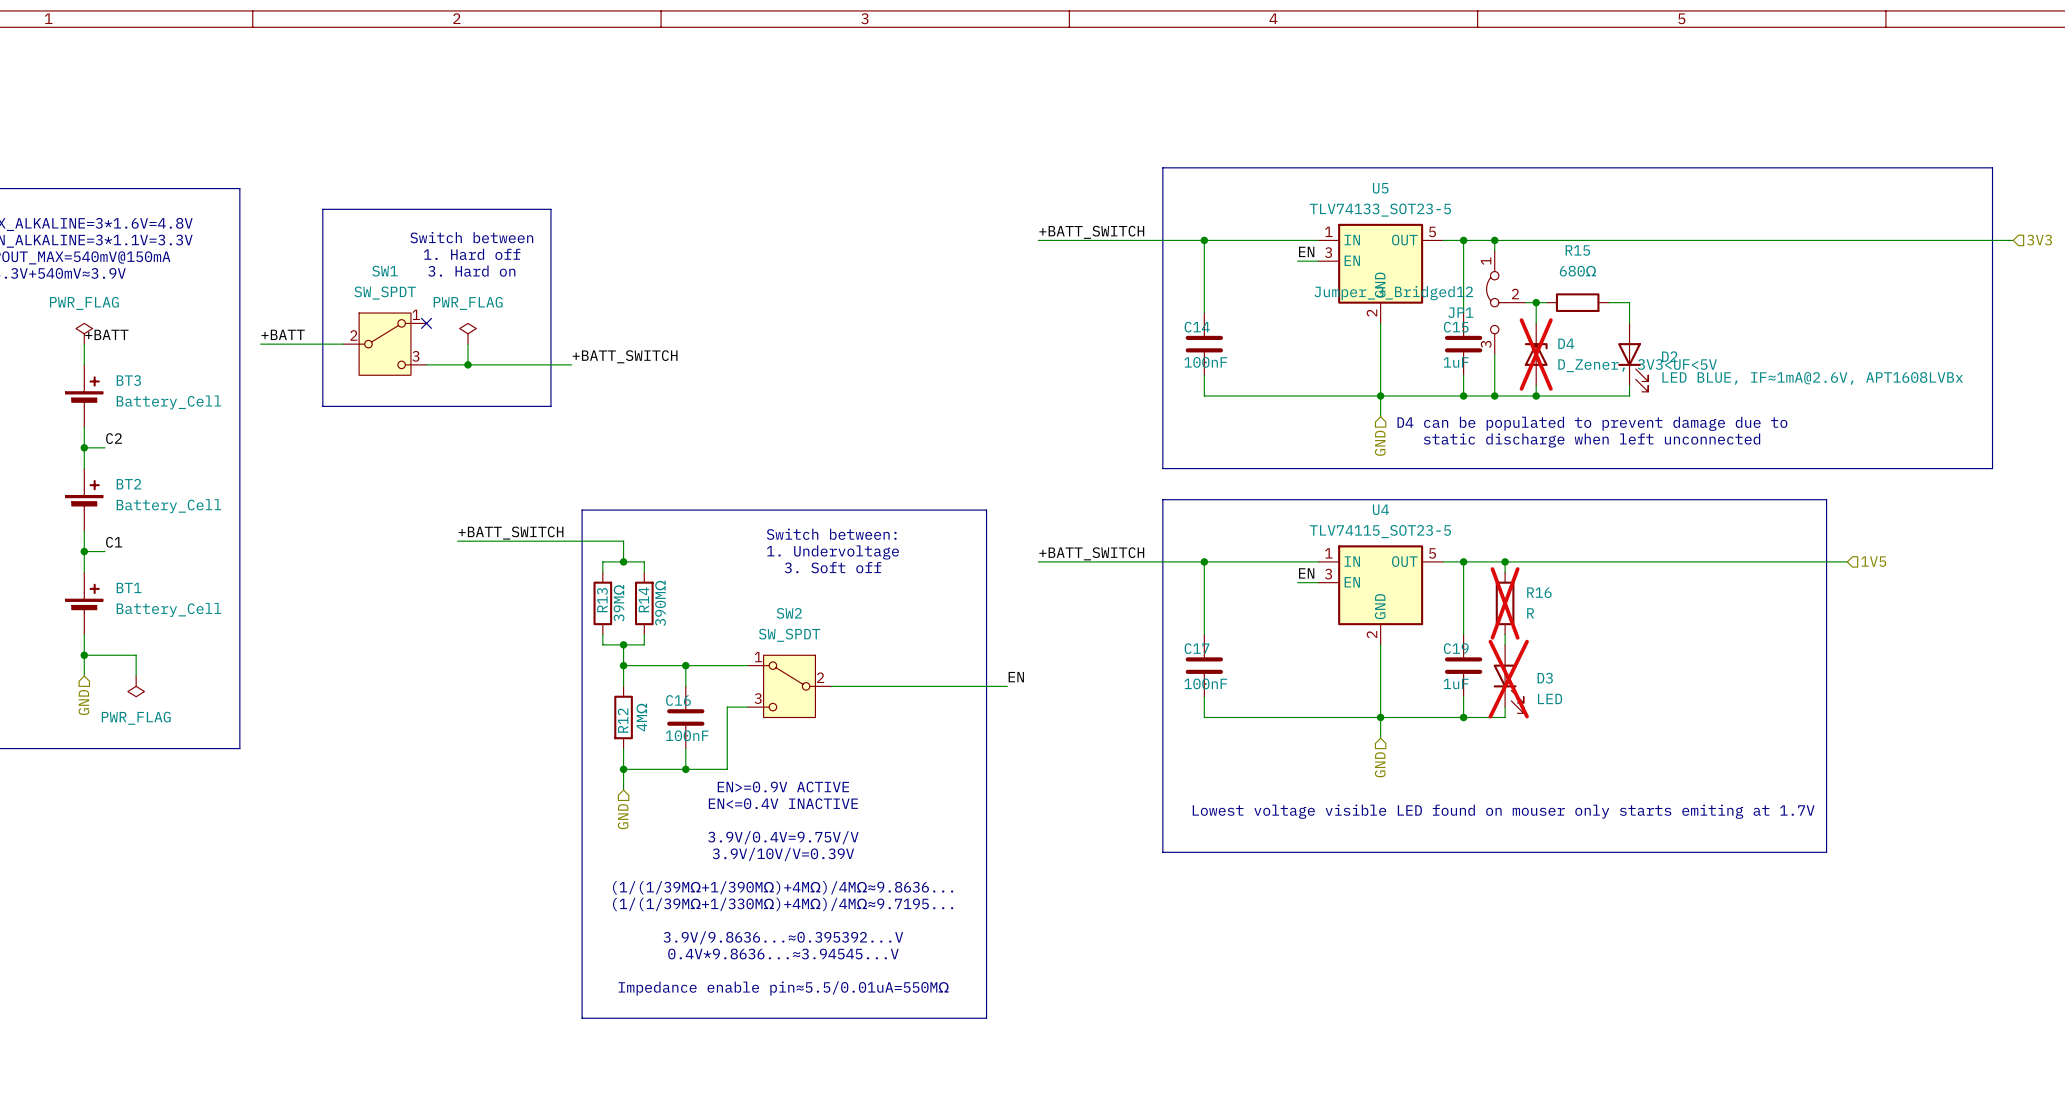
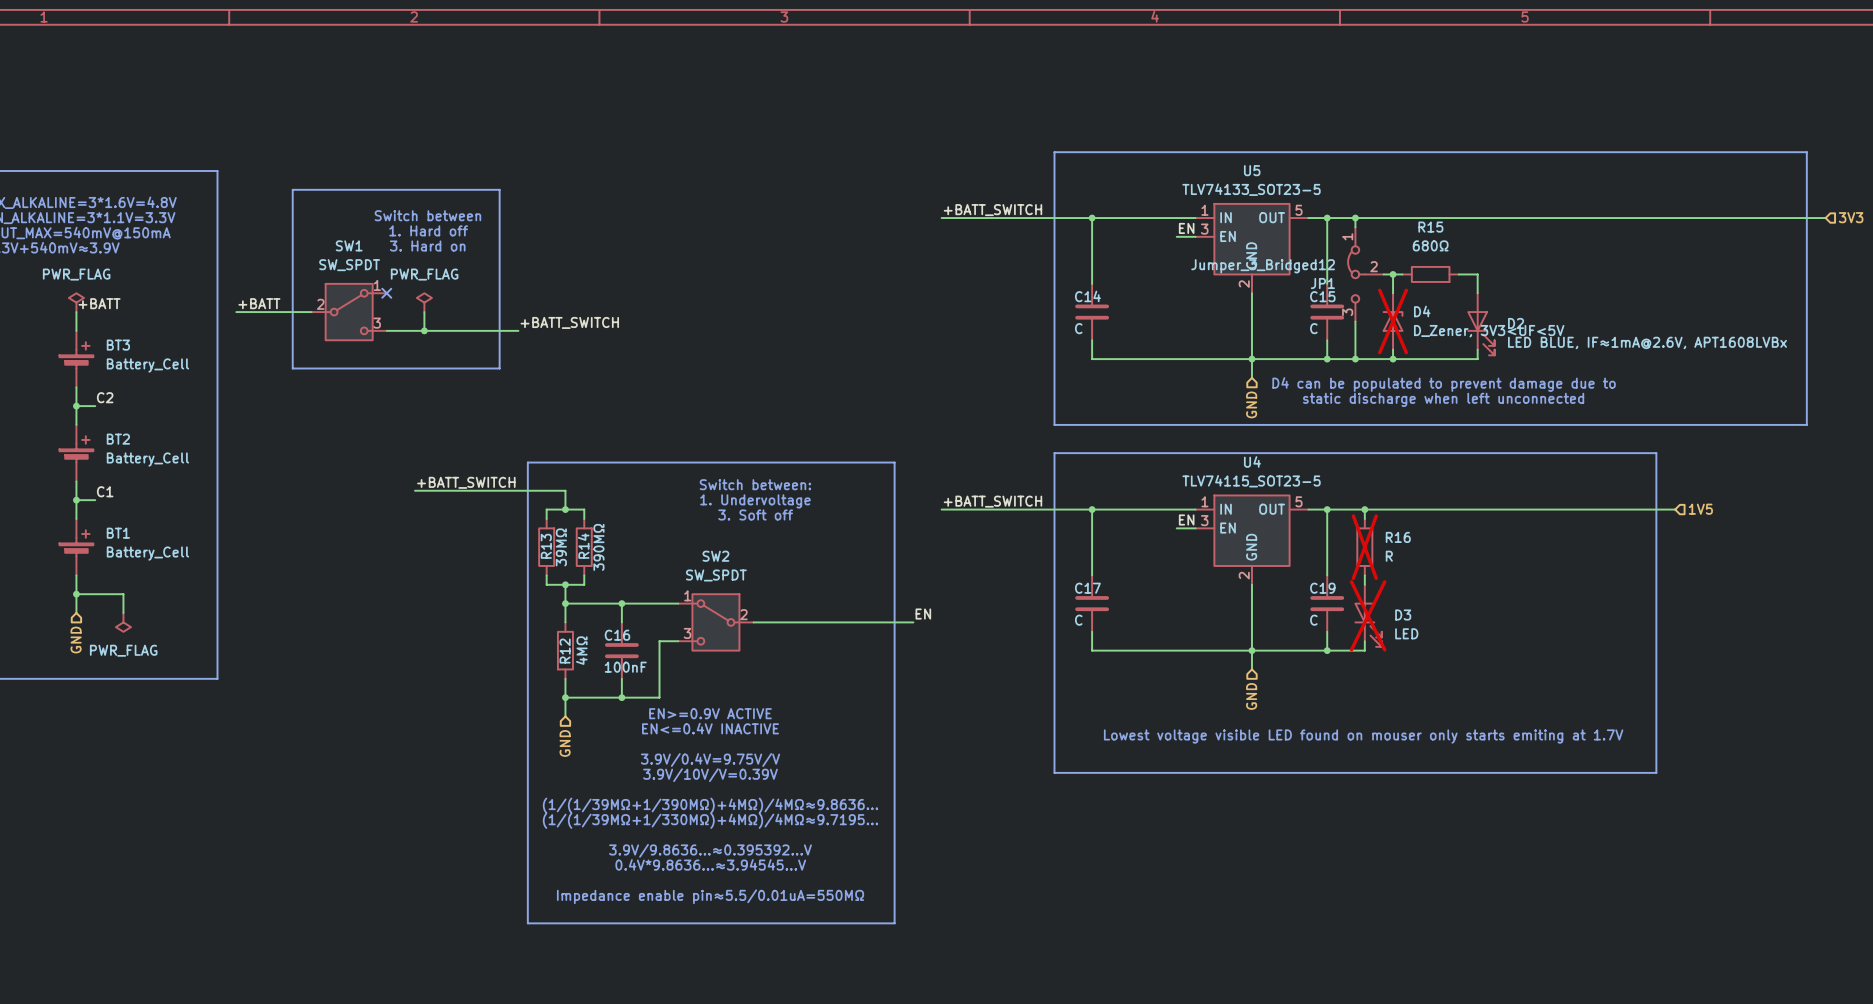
C14 value: 100nF (1205, 362) -> C (1078, 328)
C15 value: 1uF (1456, 362) -> C (1313, 328)
C17 value: 100nF (1205, 683) -> C (1078, 620)
C19 value: 1uF (1456, 684) -> C (1313, 620)

